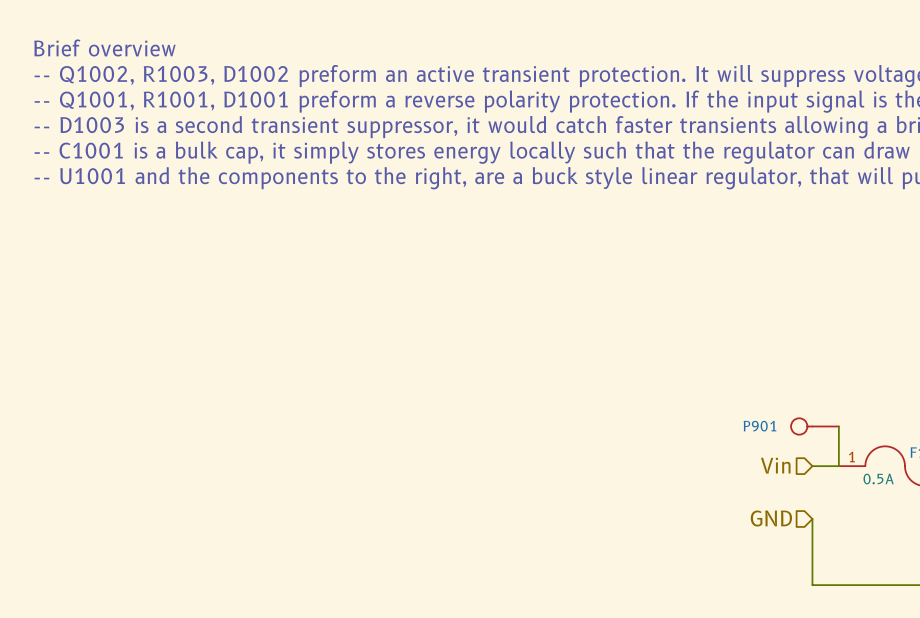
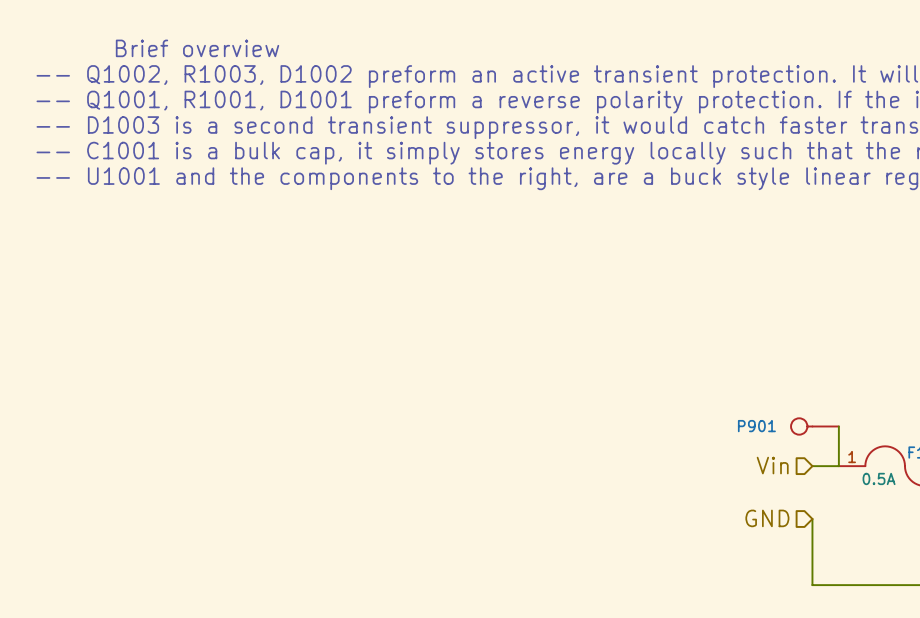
text position: Brief overview (104, 47) -> Brief overview (197, 48)

